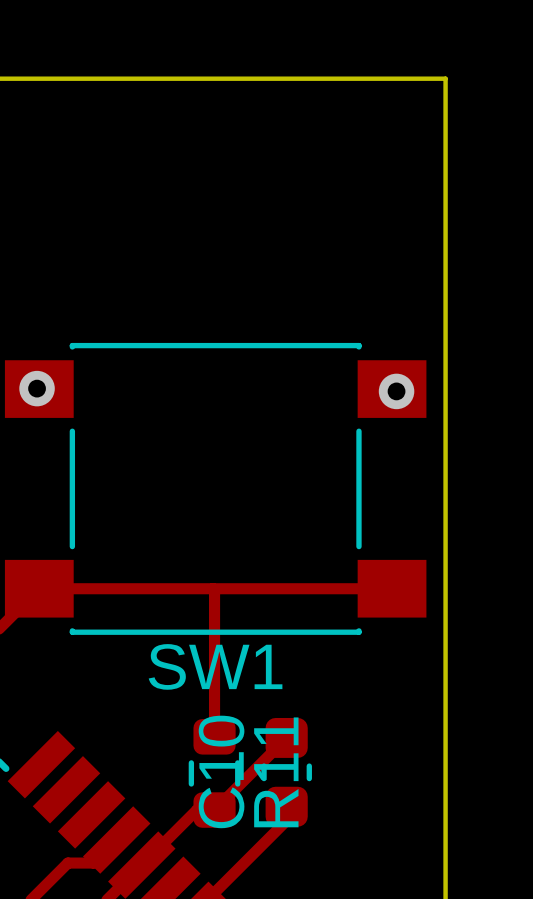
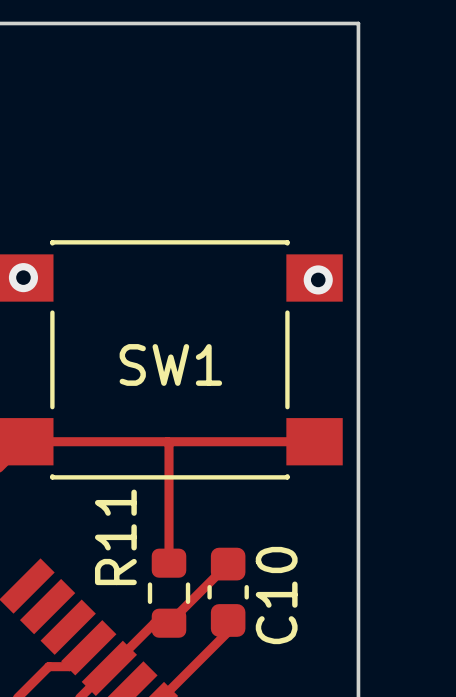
SW1 name position: SW1 (215, 666) -> SW1 (170, 364)
C10 name position: C10 (221, 771) -> C10 (276, 595)
R11 name position: R11 (276, 772) -> R11 (115, 537)

